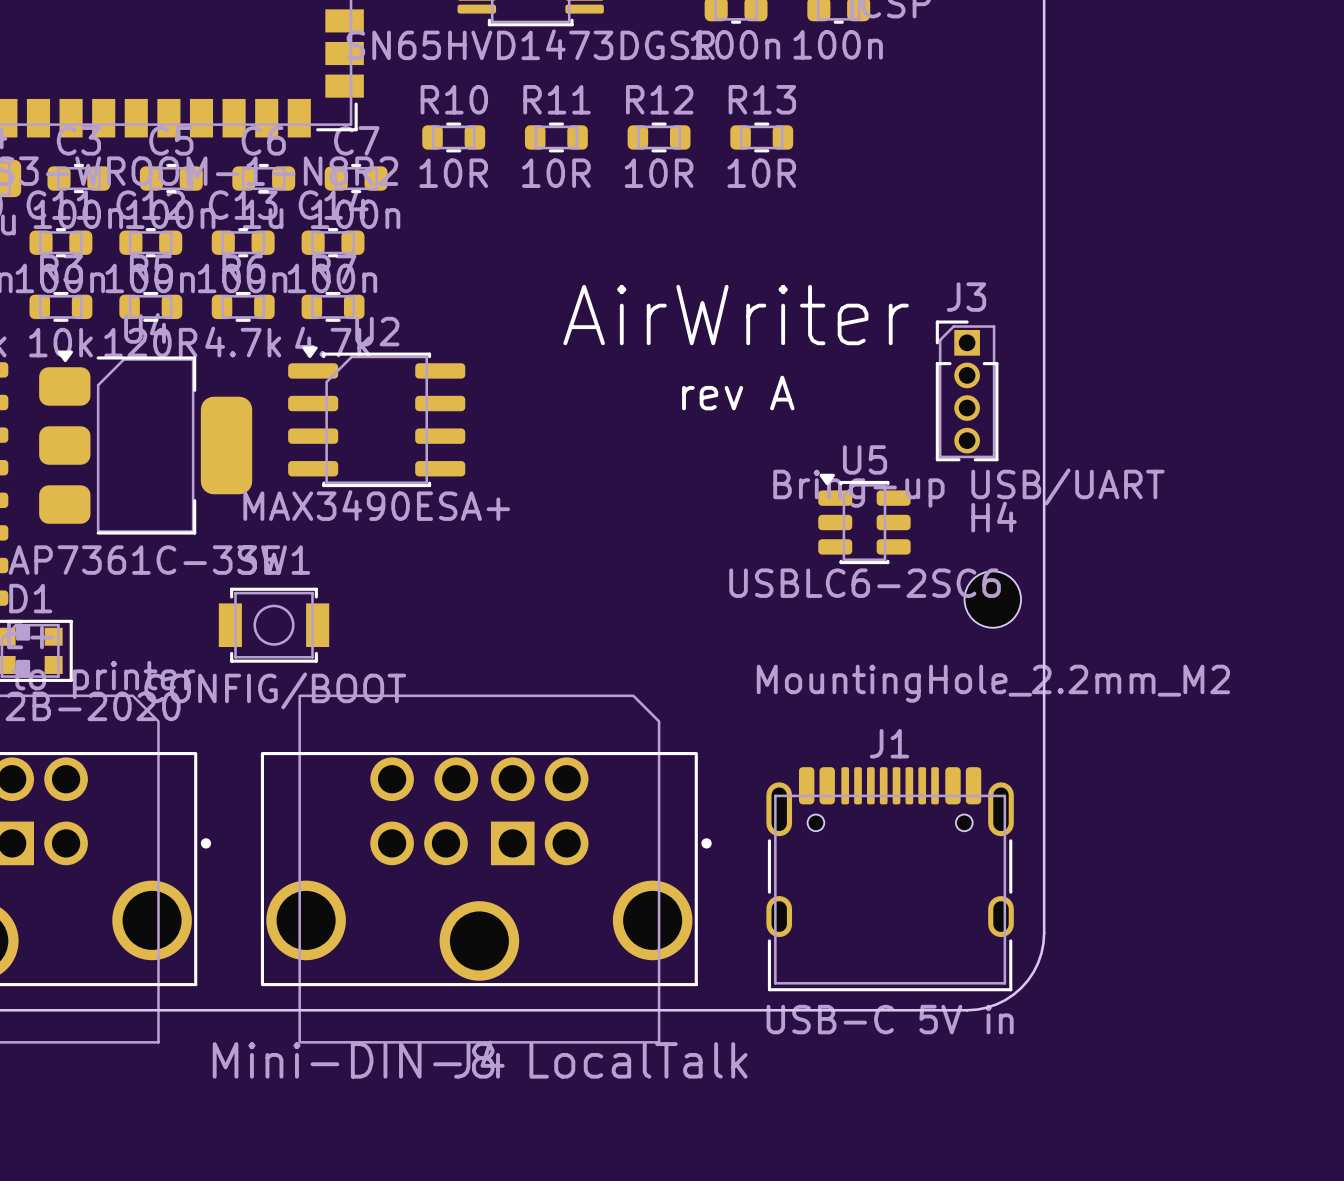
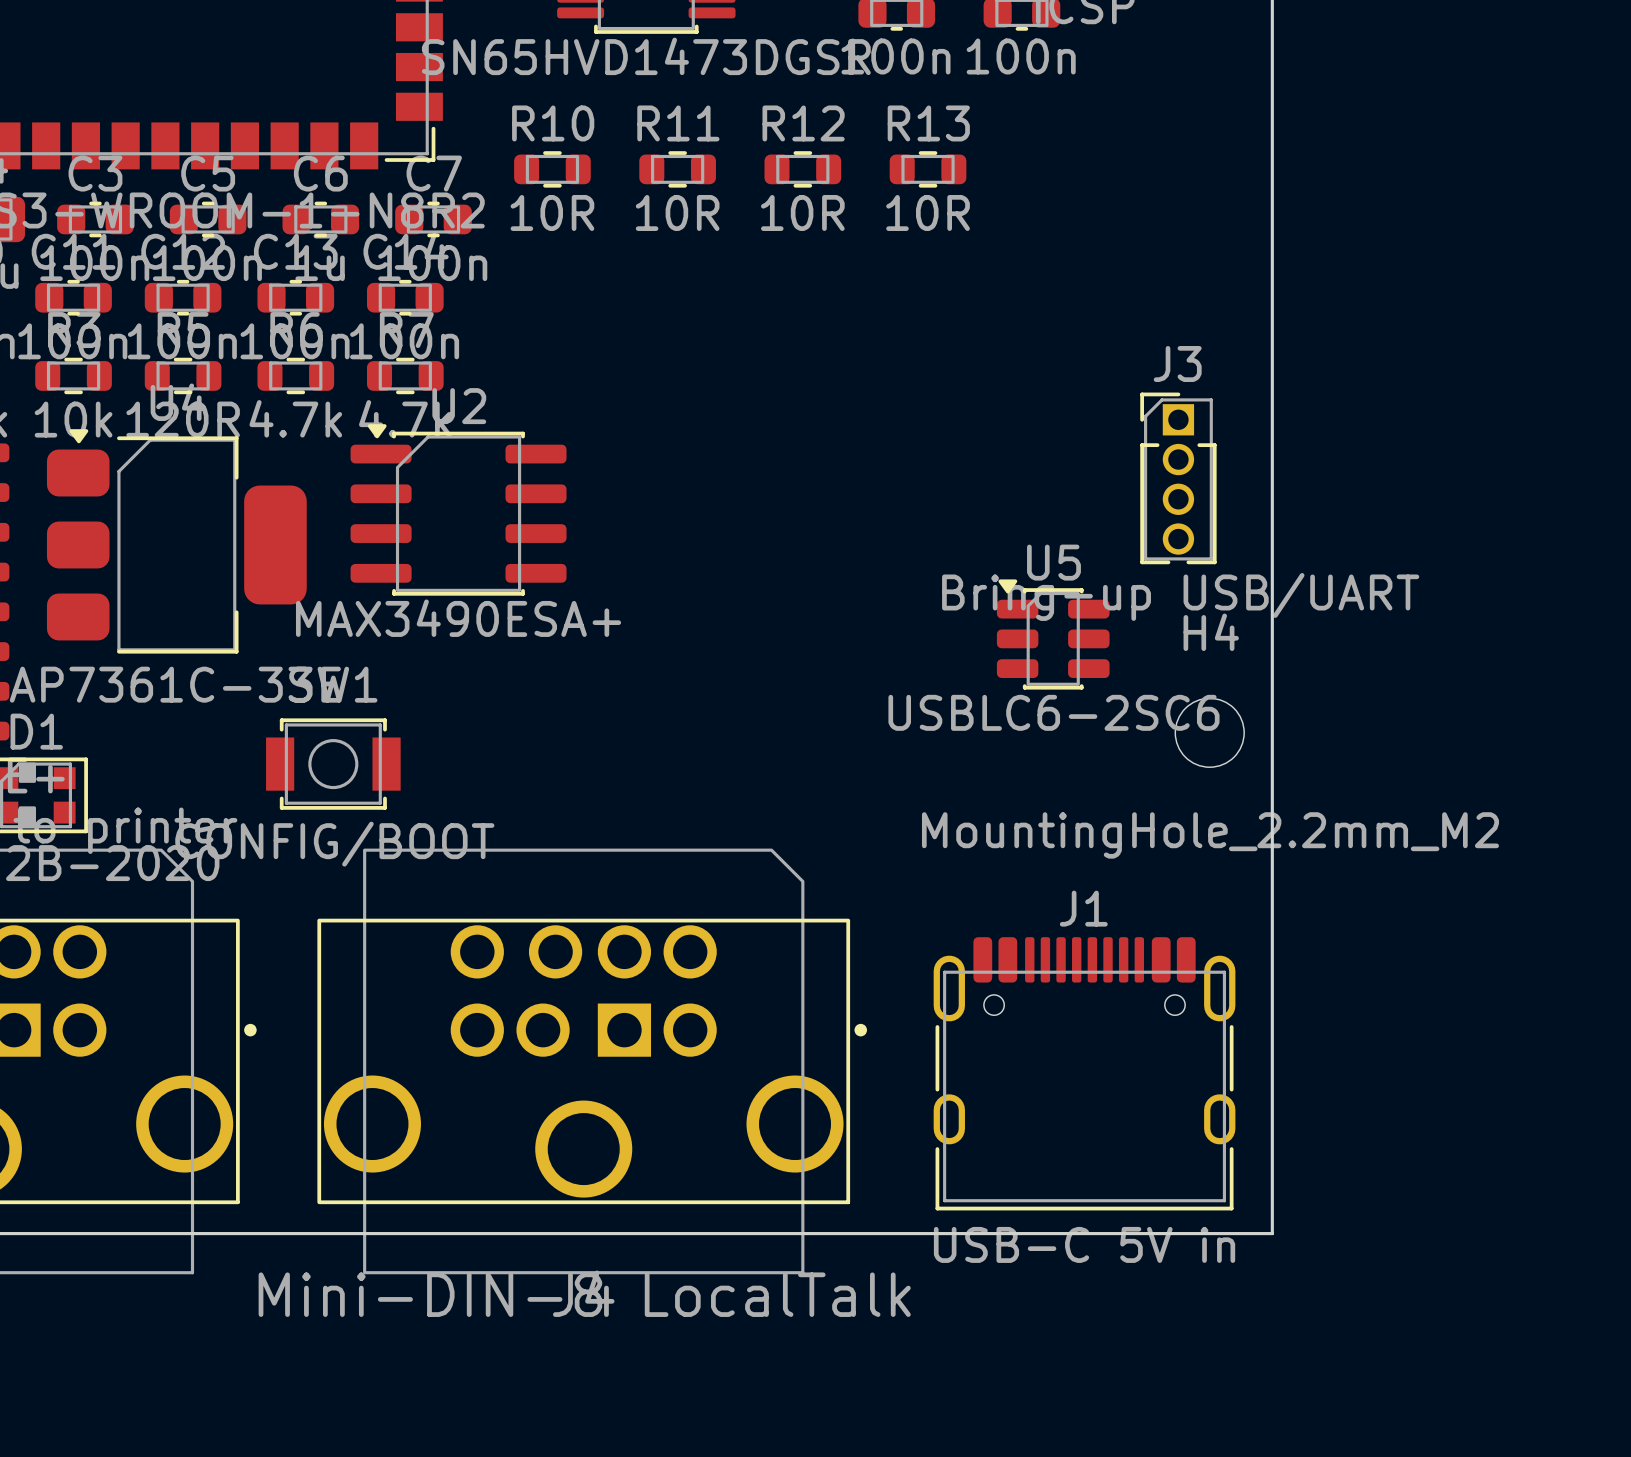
text: AirWriter (736, 315) -> none
text: rev A (738, 393) -> none
board edge: (1044, 933) (1038, 962) (1021, 987) (996, 1004) (967, 1010) -> (1272, 1139) (1272, 1233) (1178, 1233)

